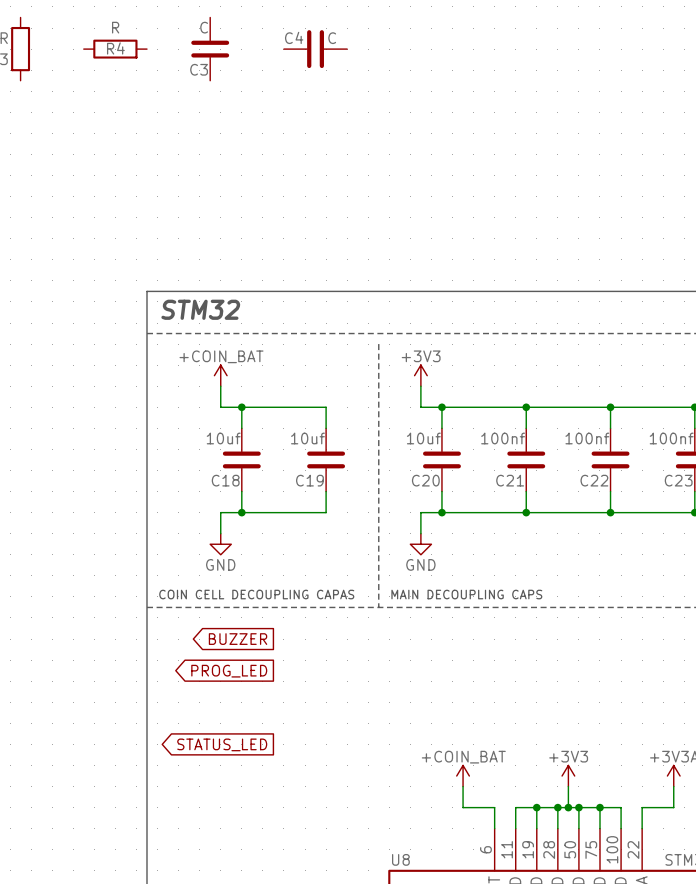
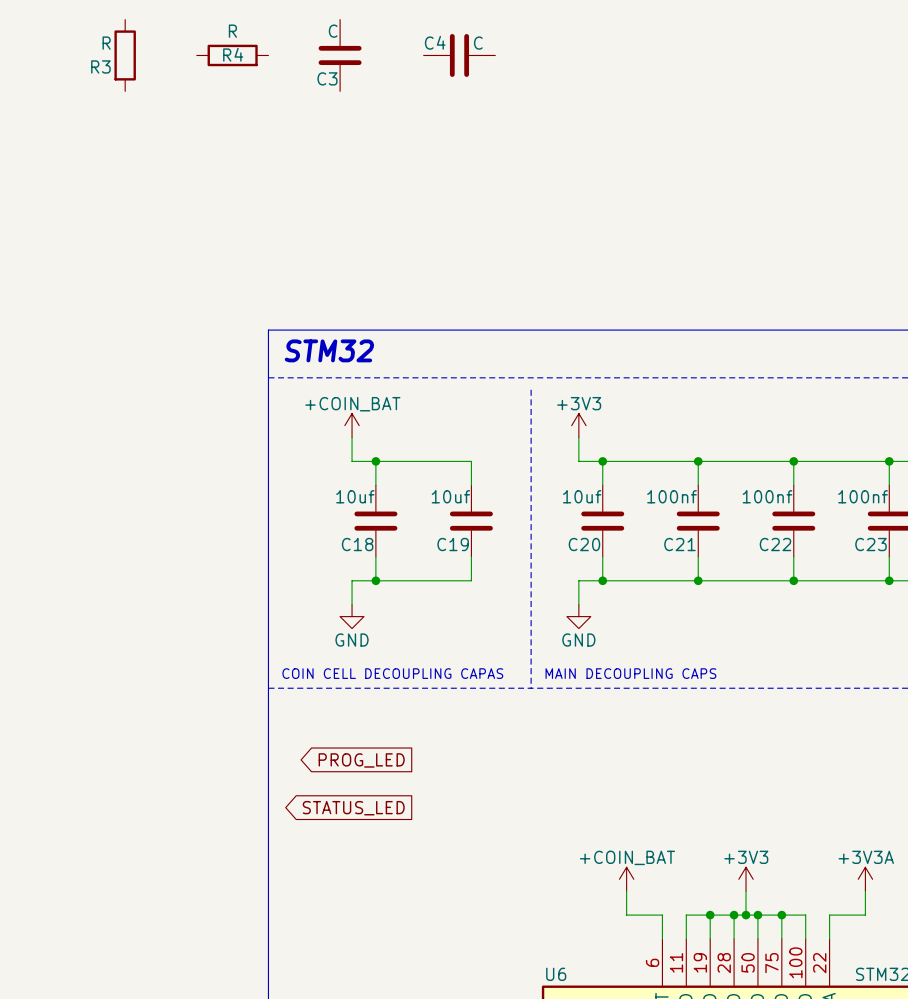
global label: BUZZER (238, 639) -> none
global label position: STATUS_LED (222, 744) -> STATUS_LED (353, 808)
U8 name: U8 (400, 859) -> U6 (556, 974)

